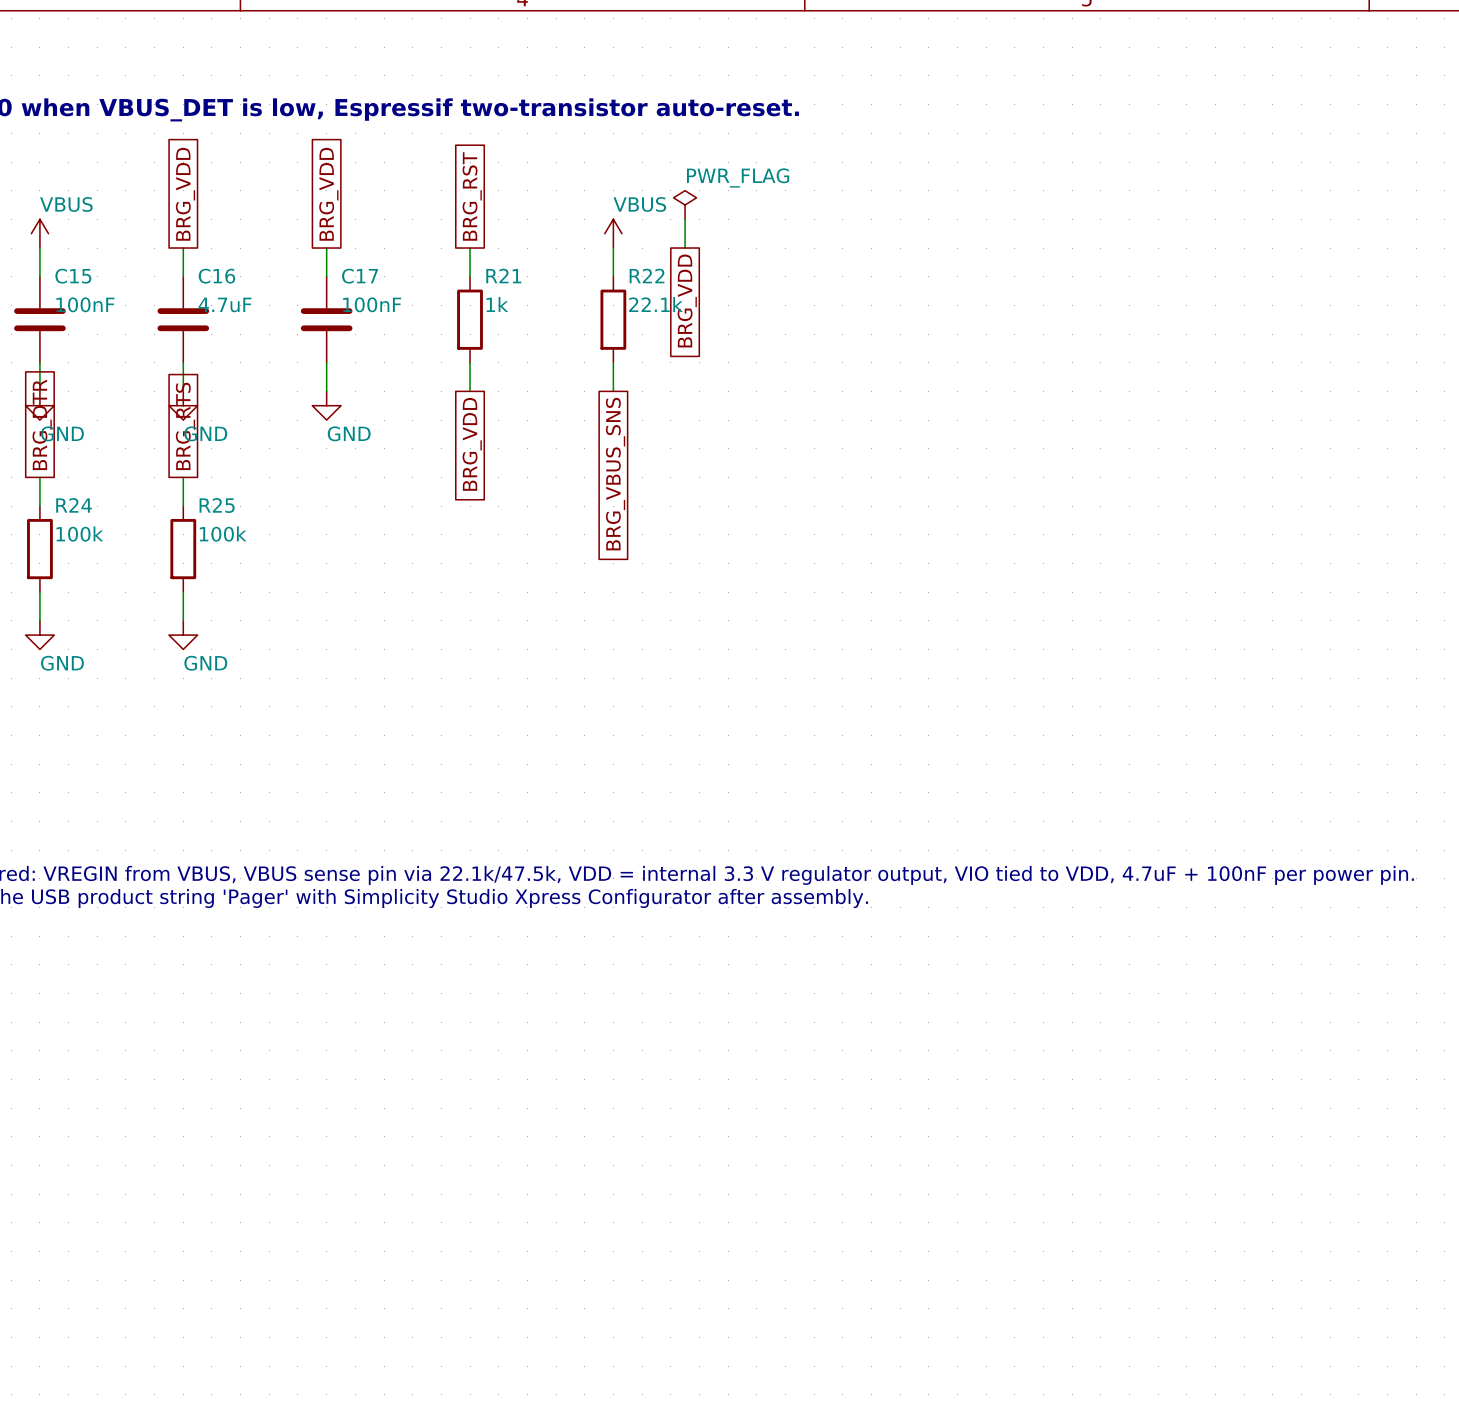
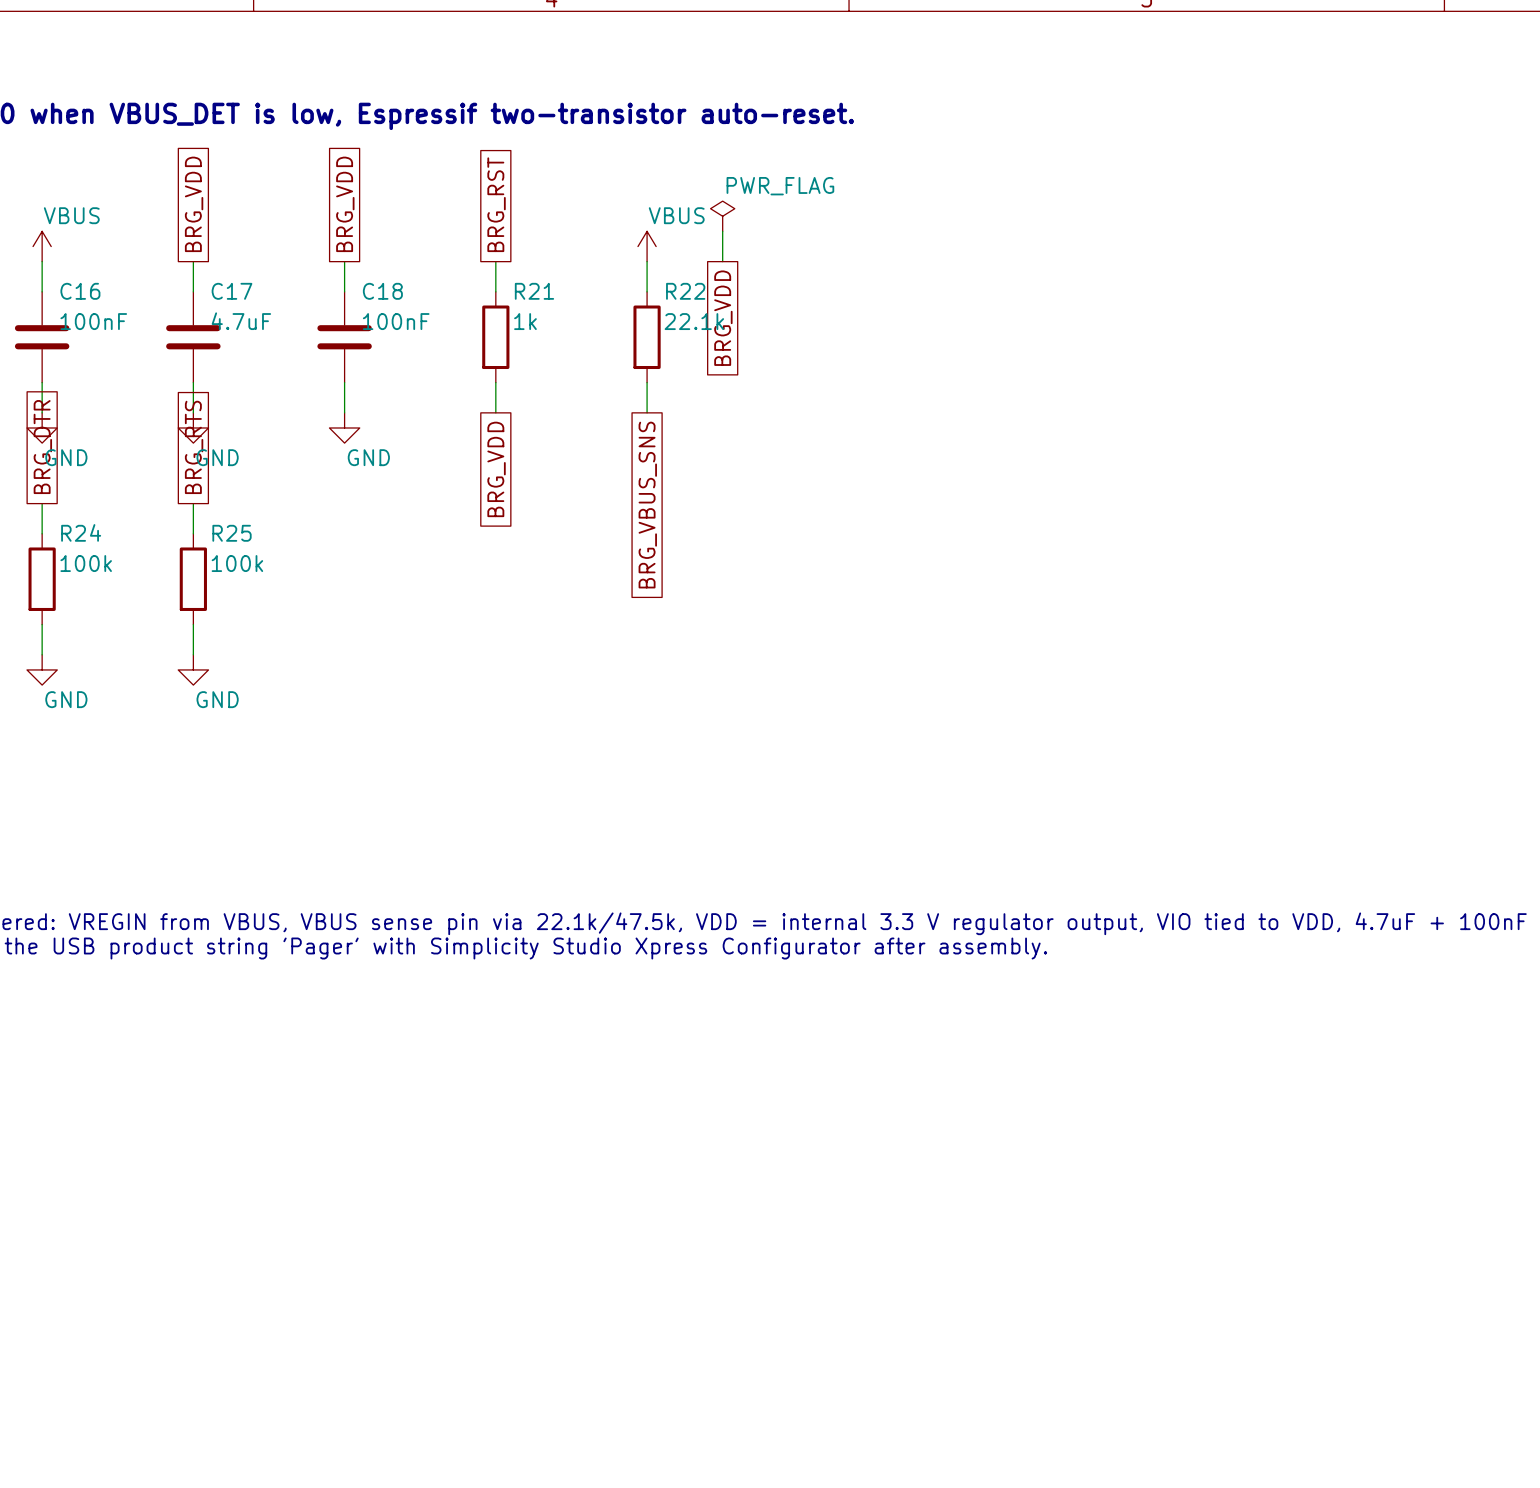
C15 name: C15 (73, 276) -> C16 (80, 291)
C16 name: C16 (216, 276) -> C17 (232, 291)
C17 name: C17 (360, 276) -> C18 (382, 291)

